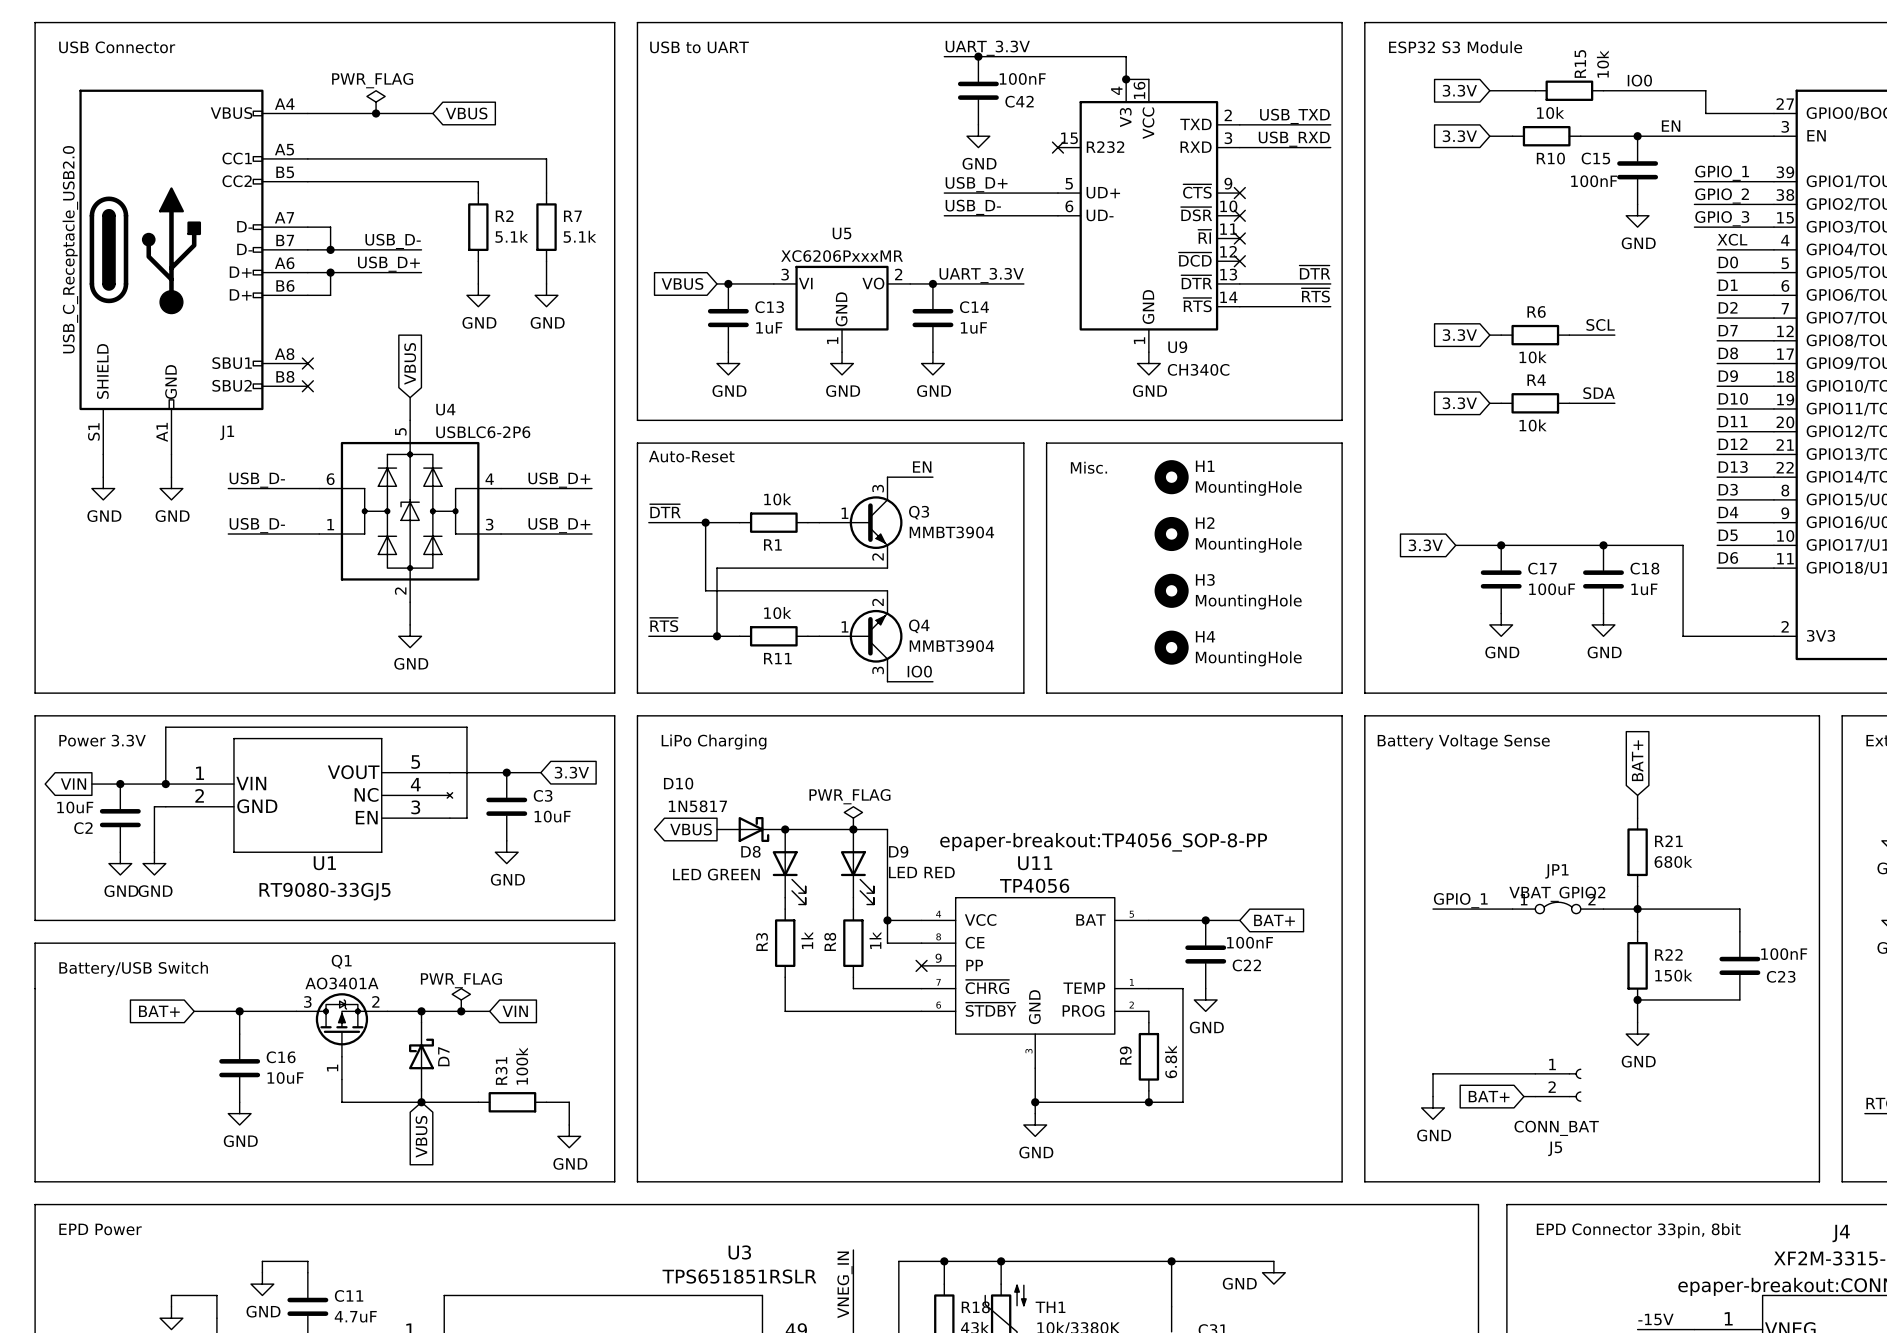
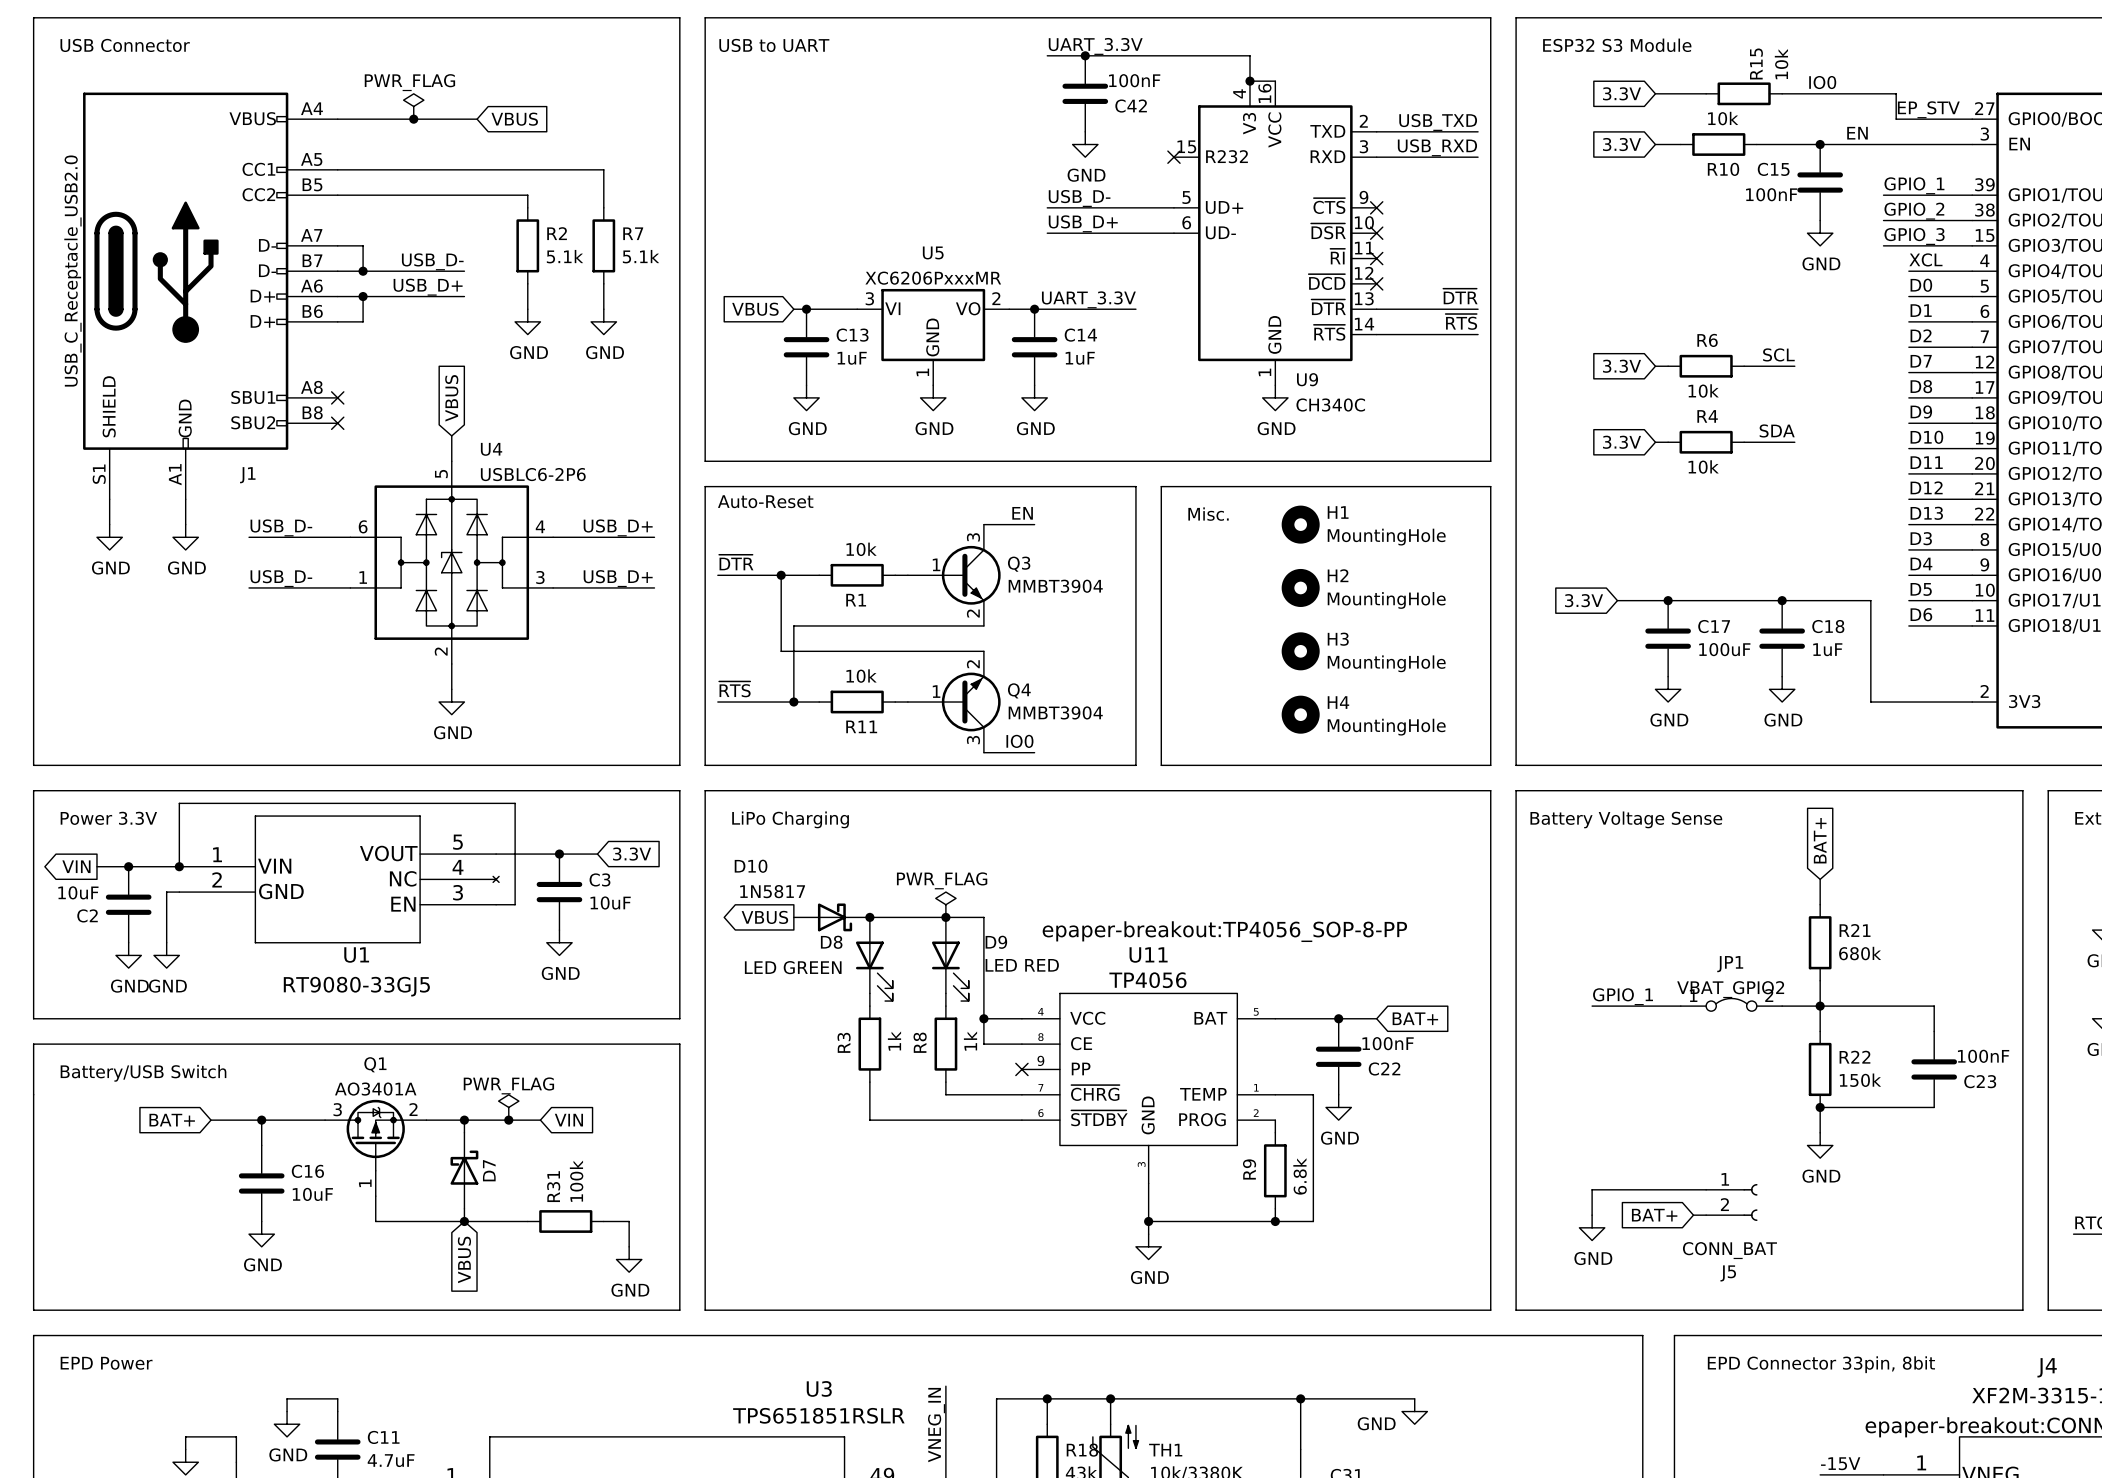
label: none -> EP_STV (1928, 109)
label: USB_D+ (976, 184) -> USB_D- (1079, 198)
label: USB_D- (973, 207) -> USB_D+ (1083, 223)

